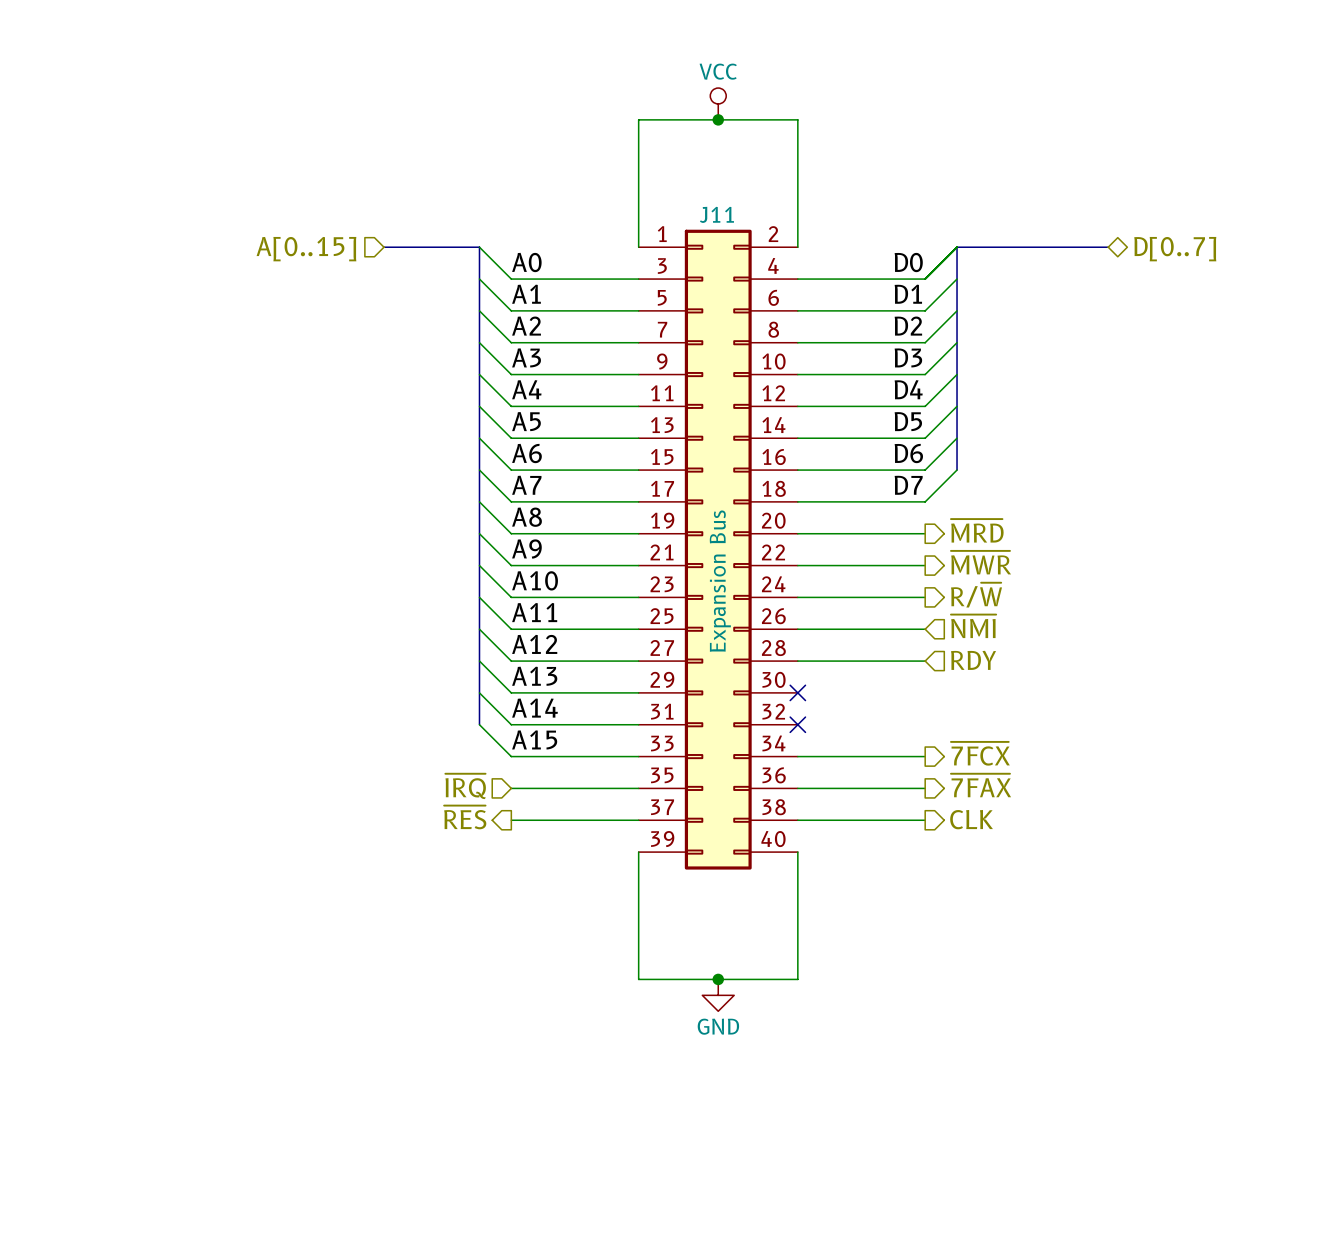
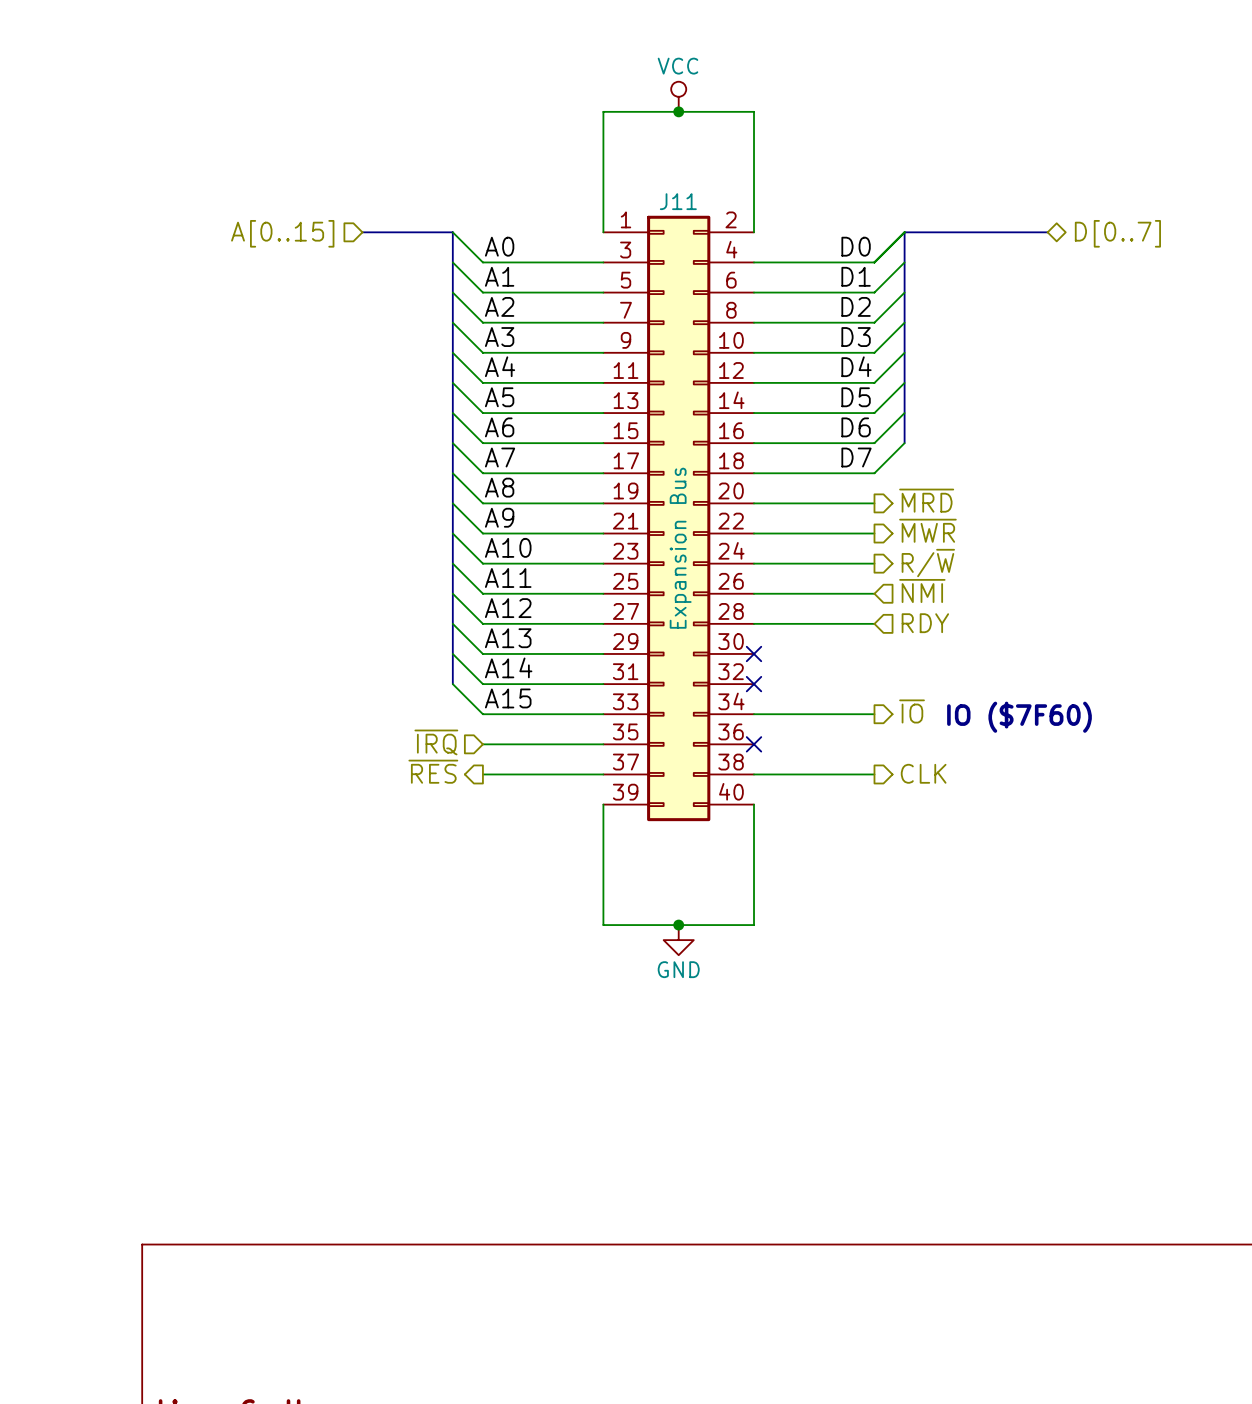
hierarchical label: ~{7FCX} (980, 753) -> ~{IO} (912, 711)
text: none -> IO ($7F60) (1019, 717)
hierarchical label: ~{7FAX} (981, 785) -> none
wire: (797, 788) (925, 788) -> none
no-connect mark: none -> (754, 744)

